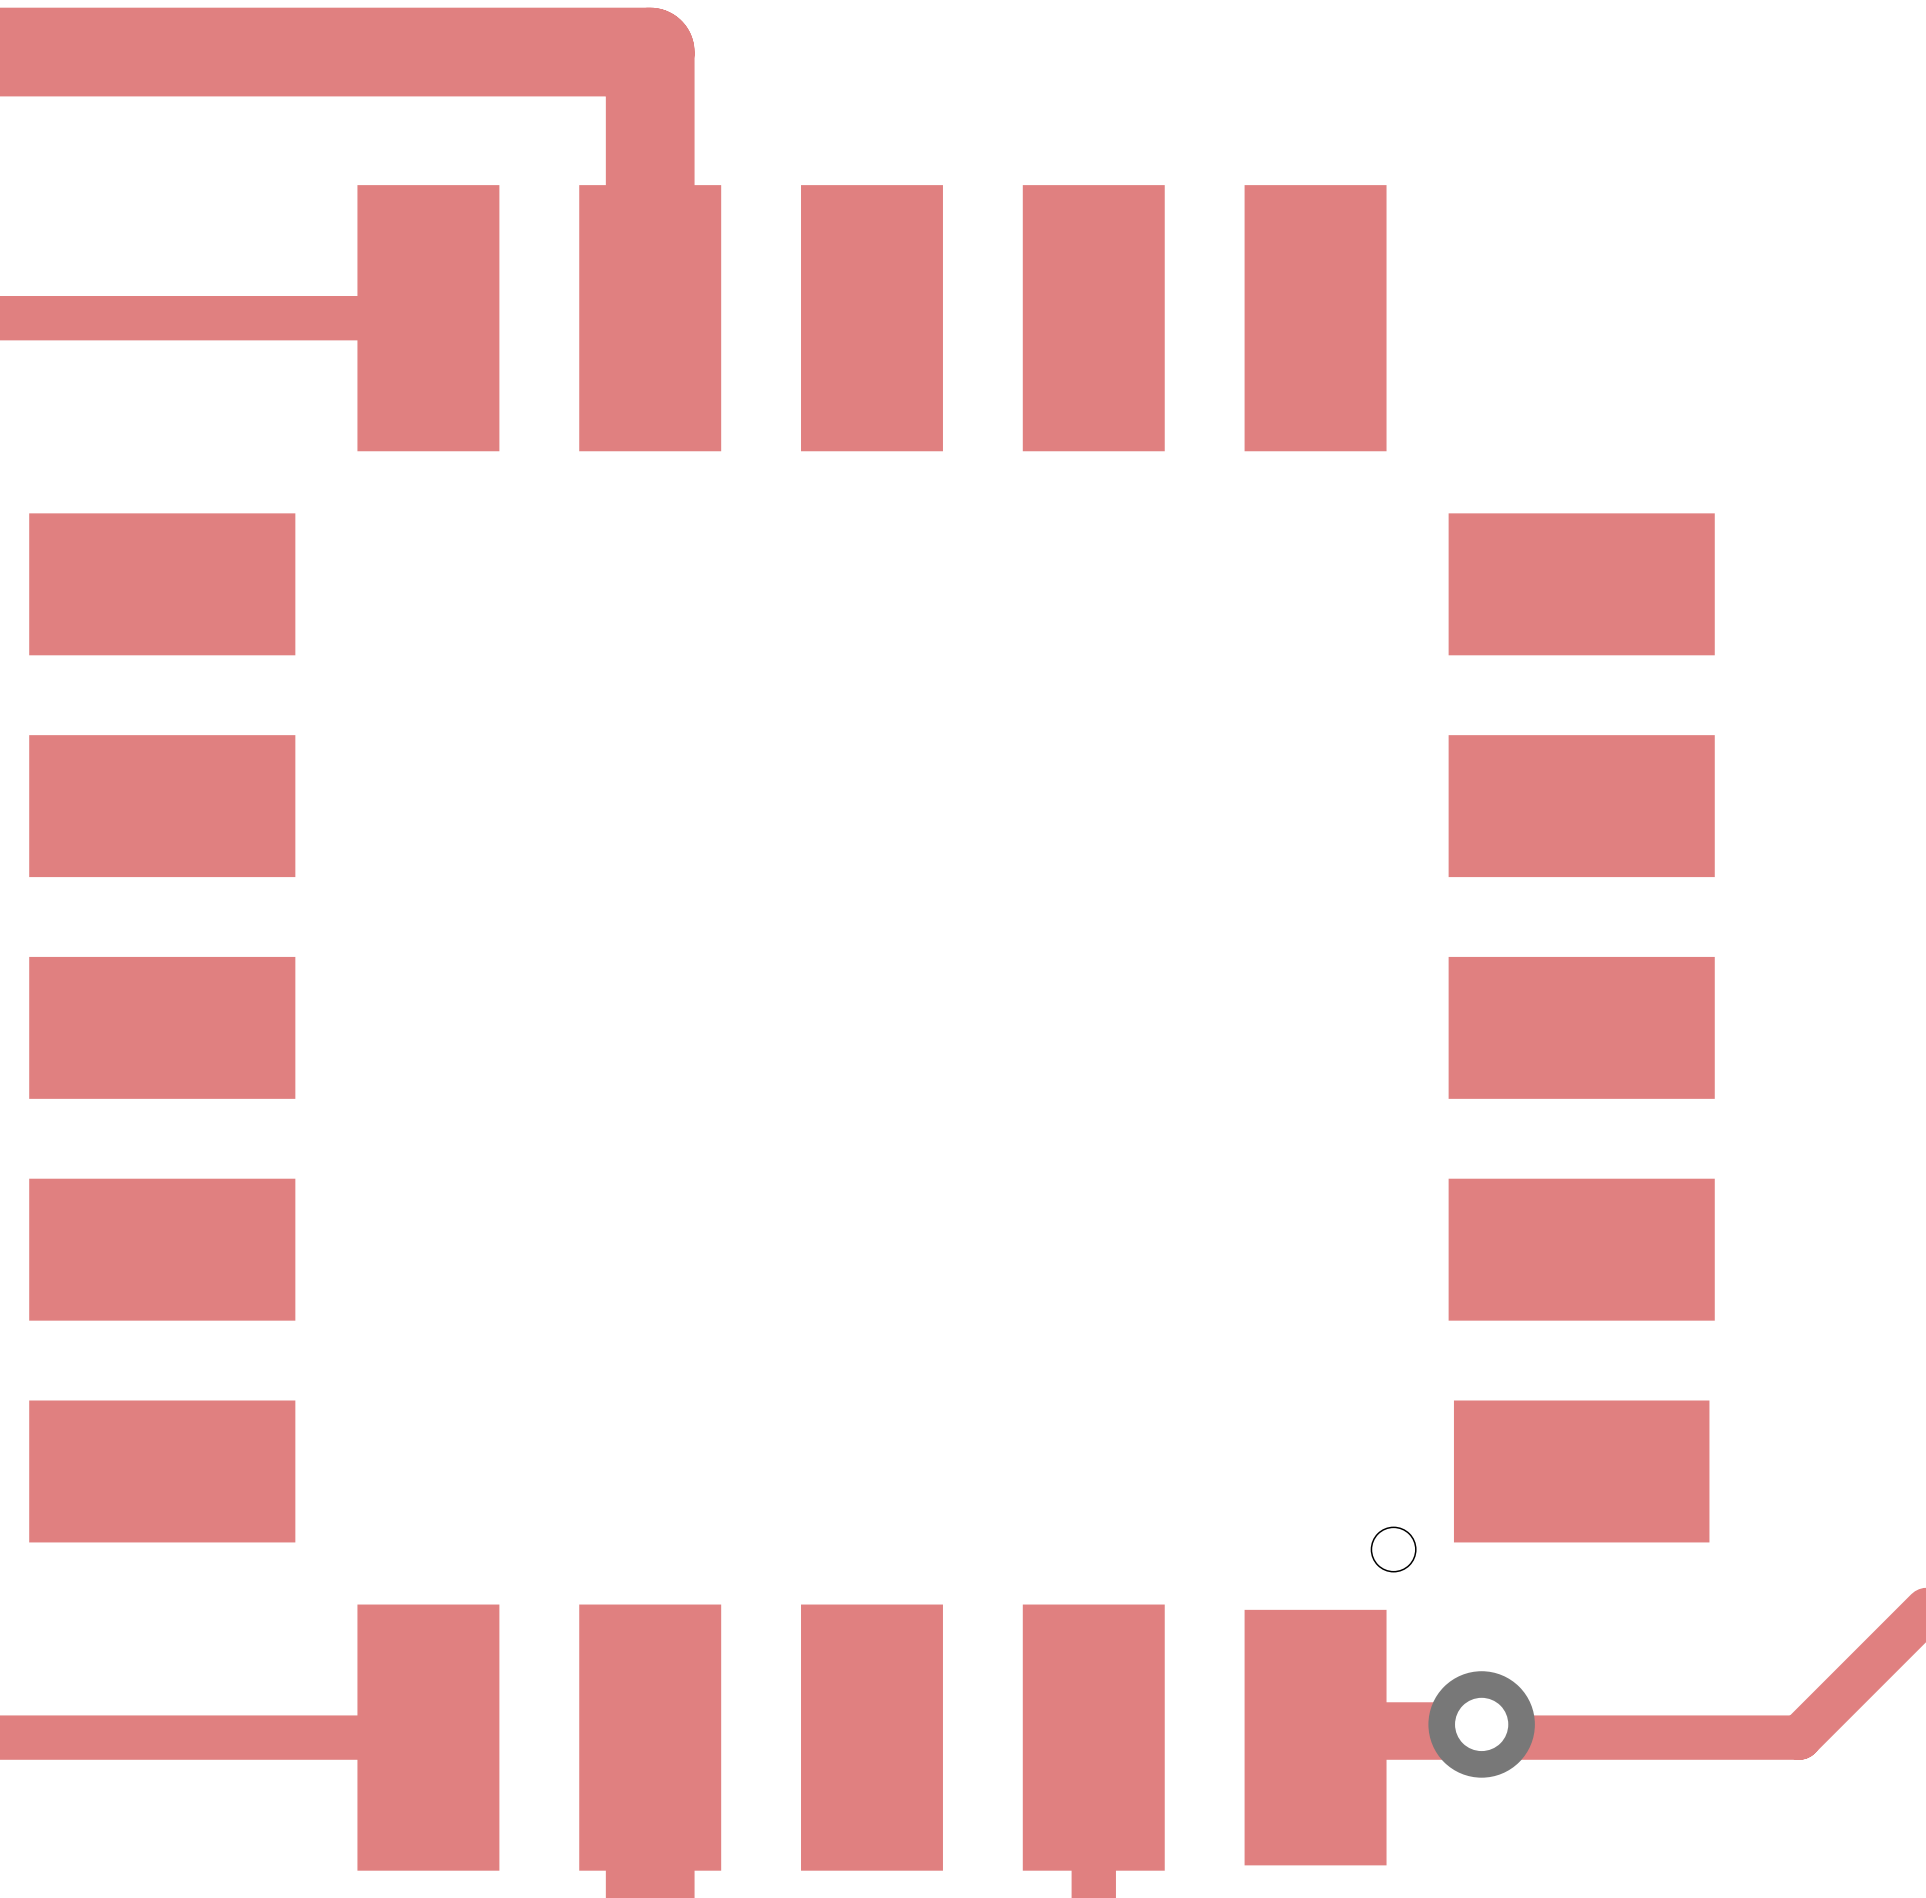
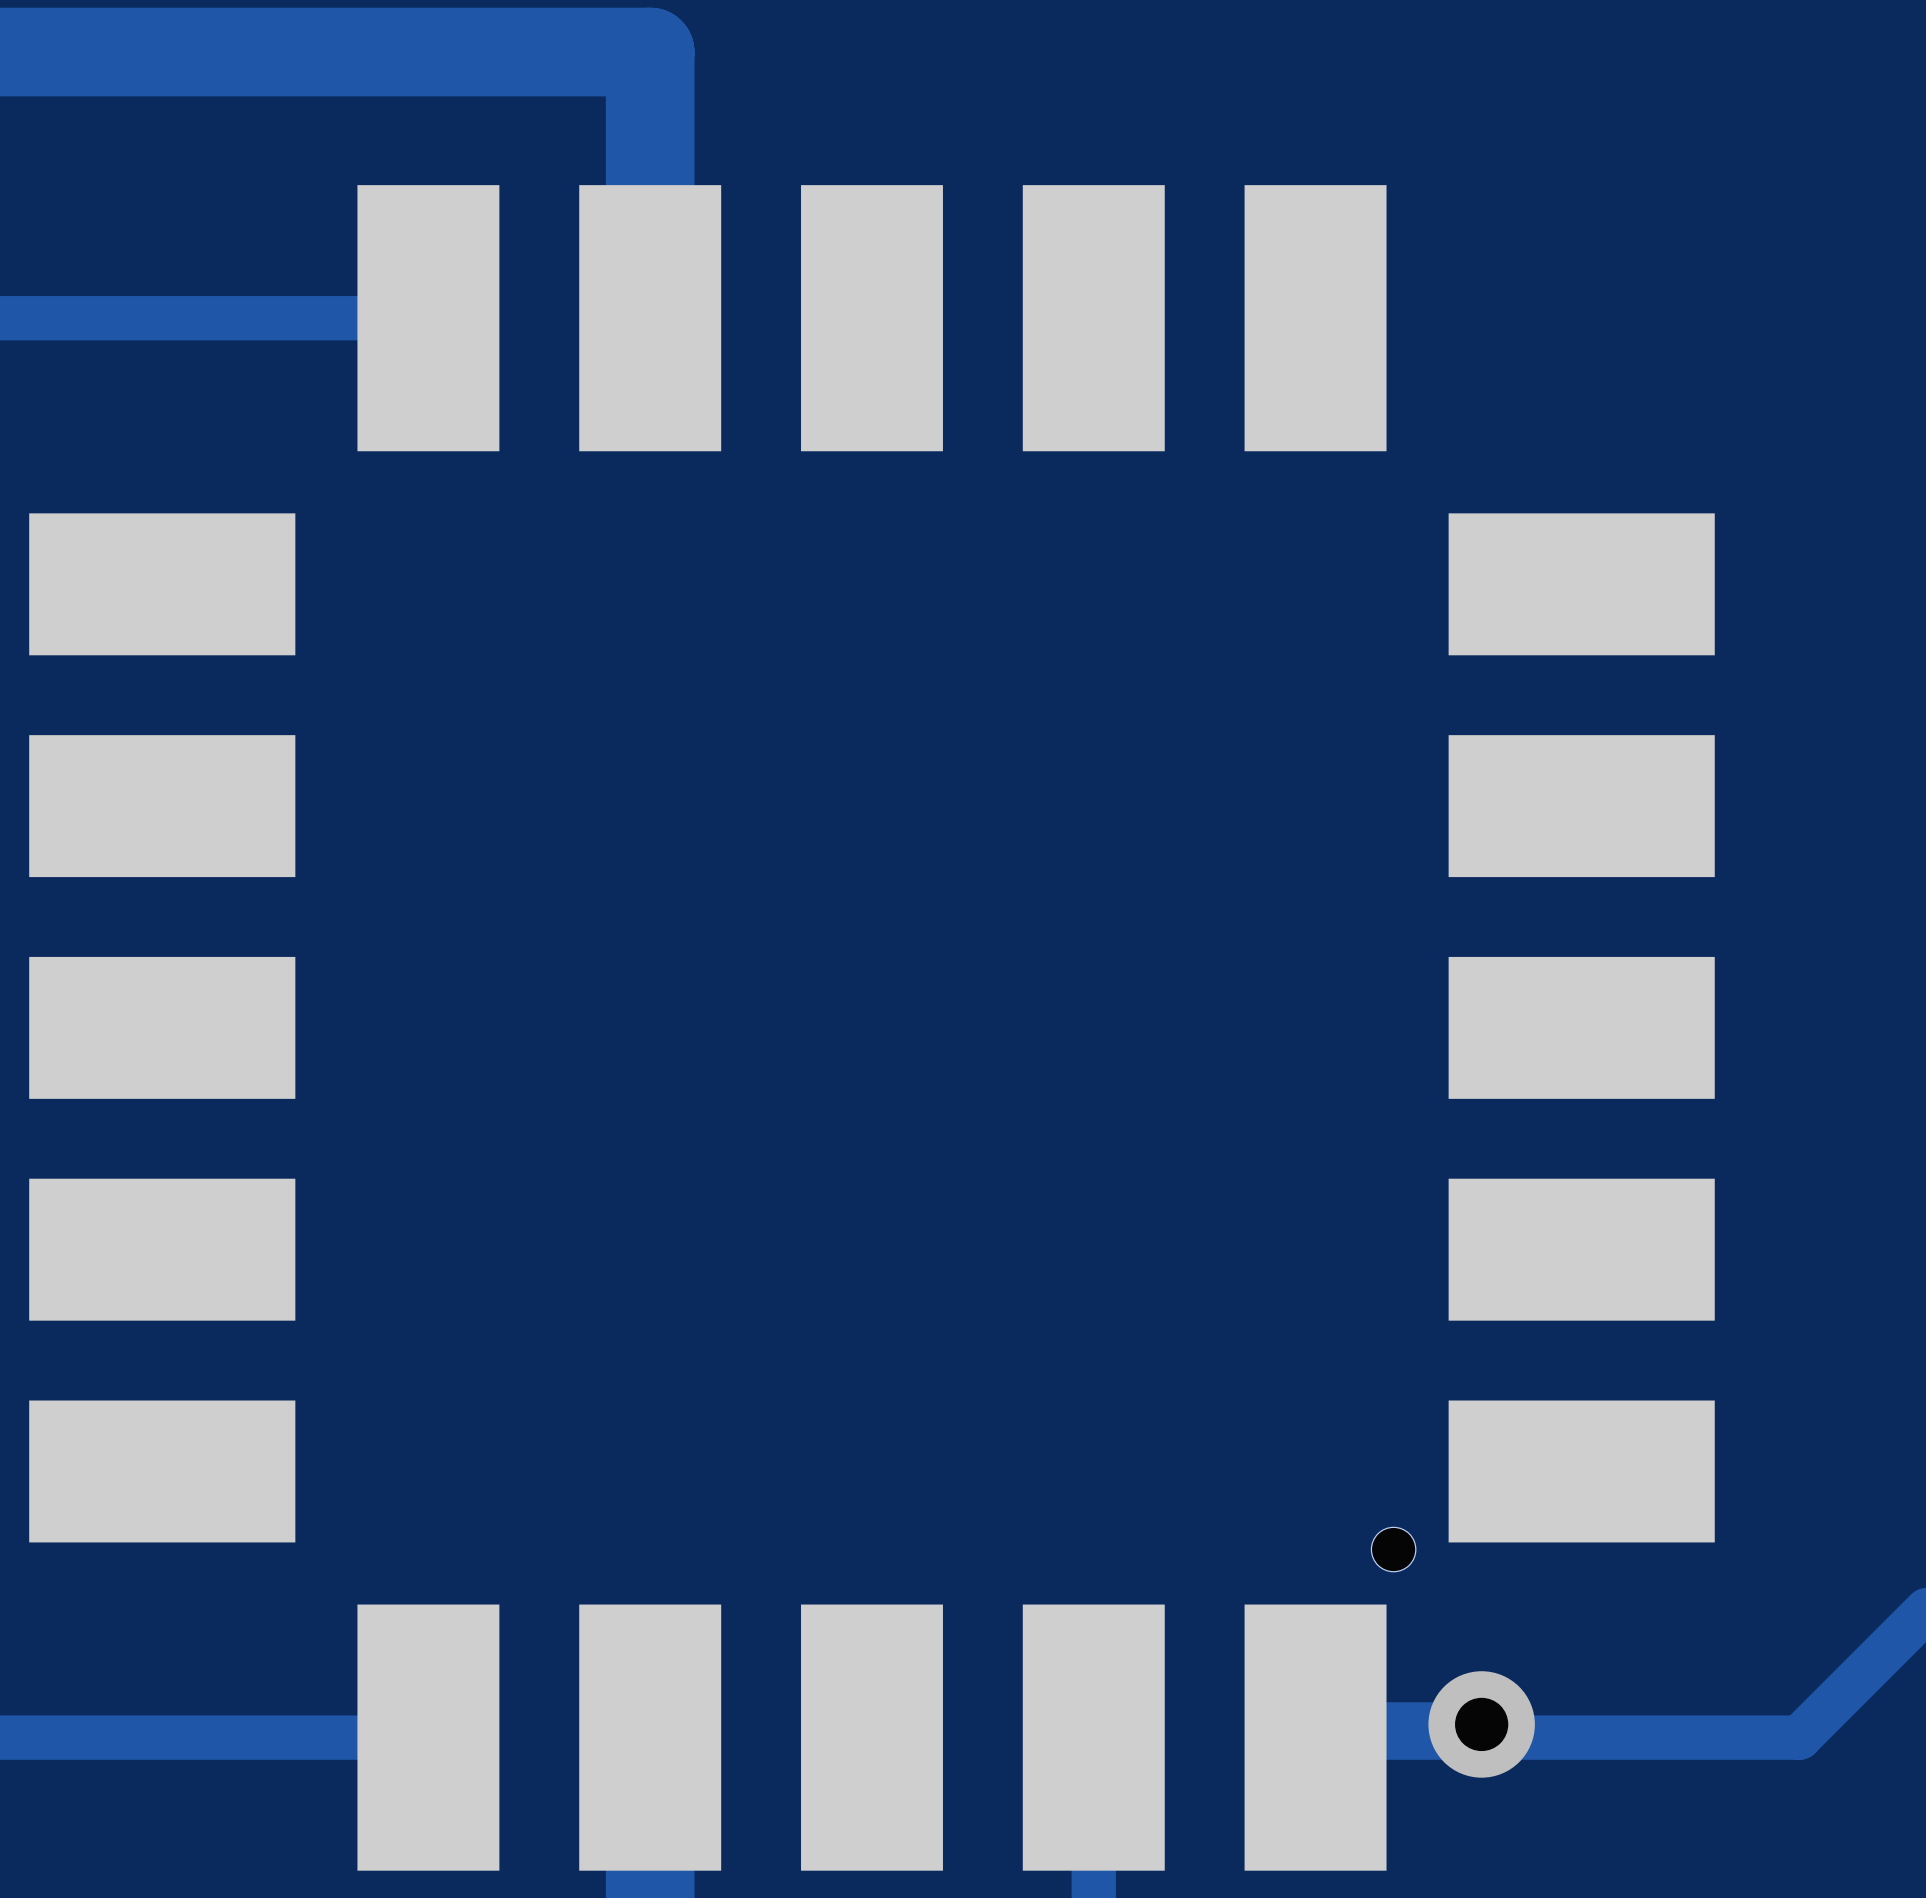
part footprint: [29, 185, 1715, 1871] -> [29, 185, 1715, 1871]

